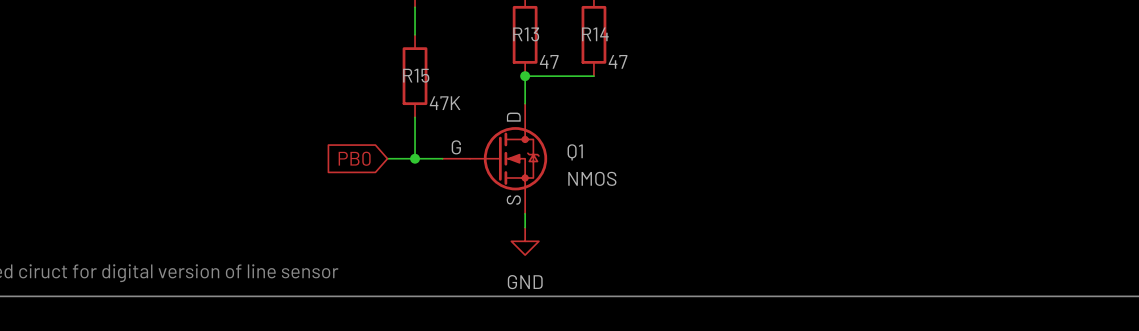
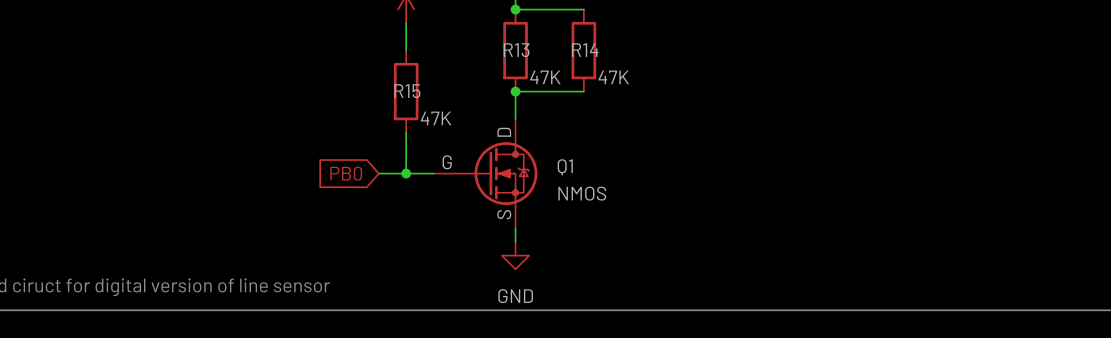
R13 value: 47 (549, 61) -> 47K (545, 77)
R14 value: 47 (618, 61) -> 47K (613, 77)

